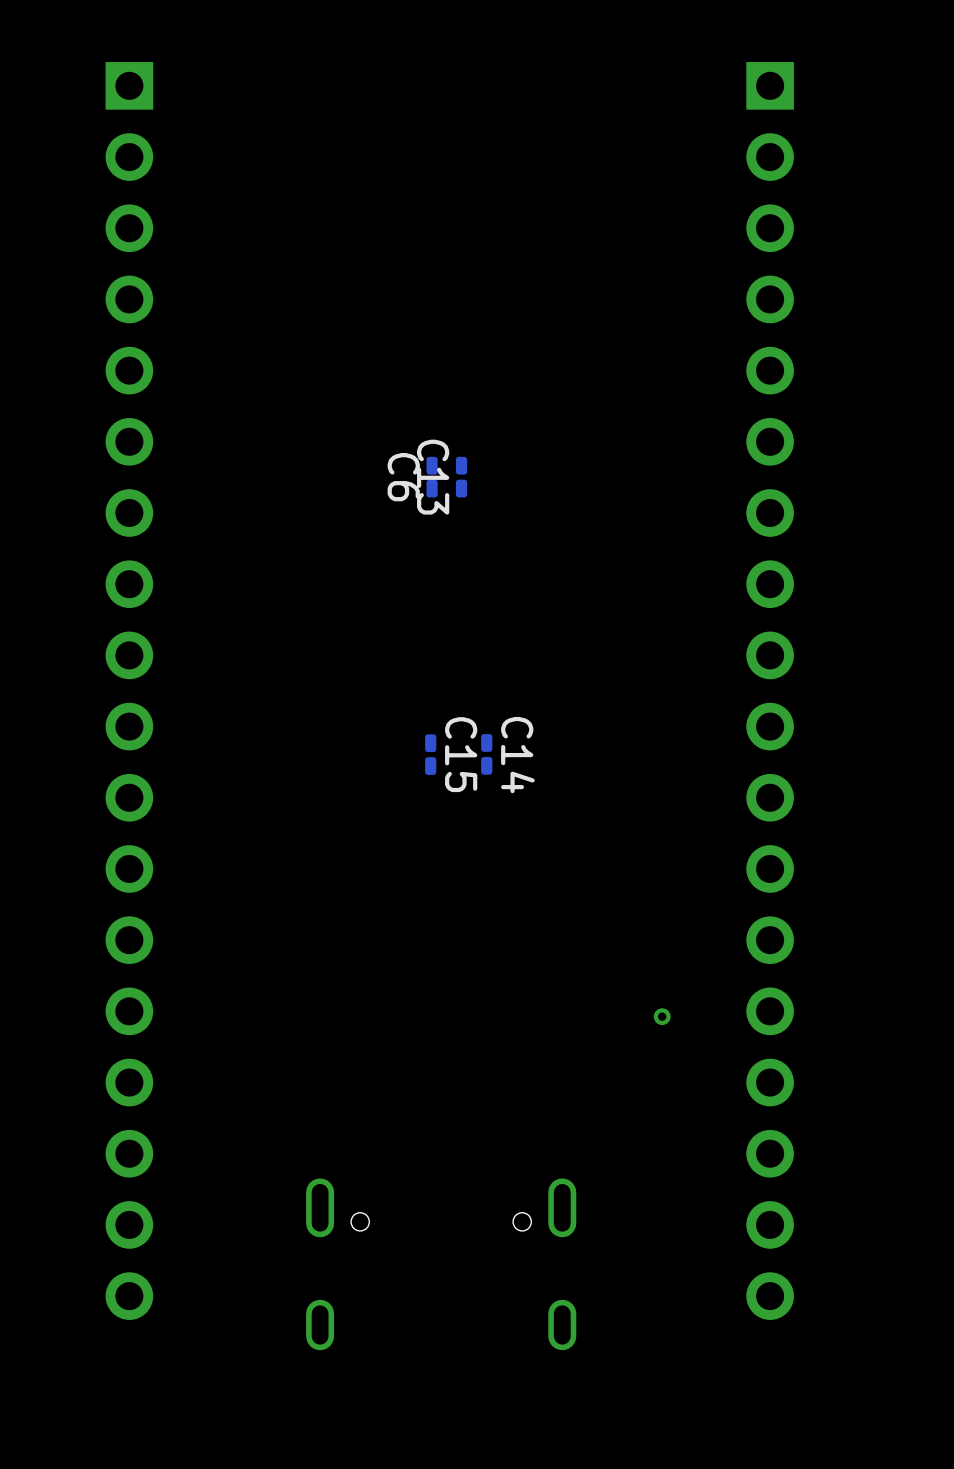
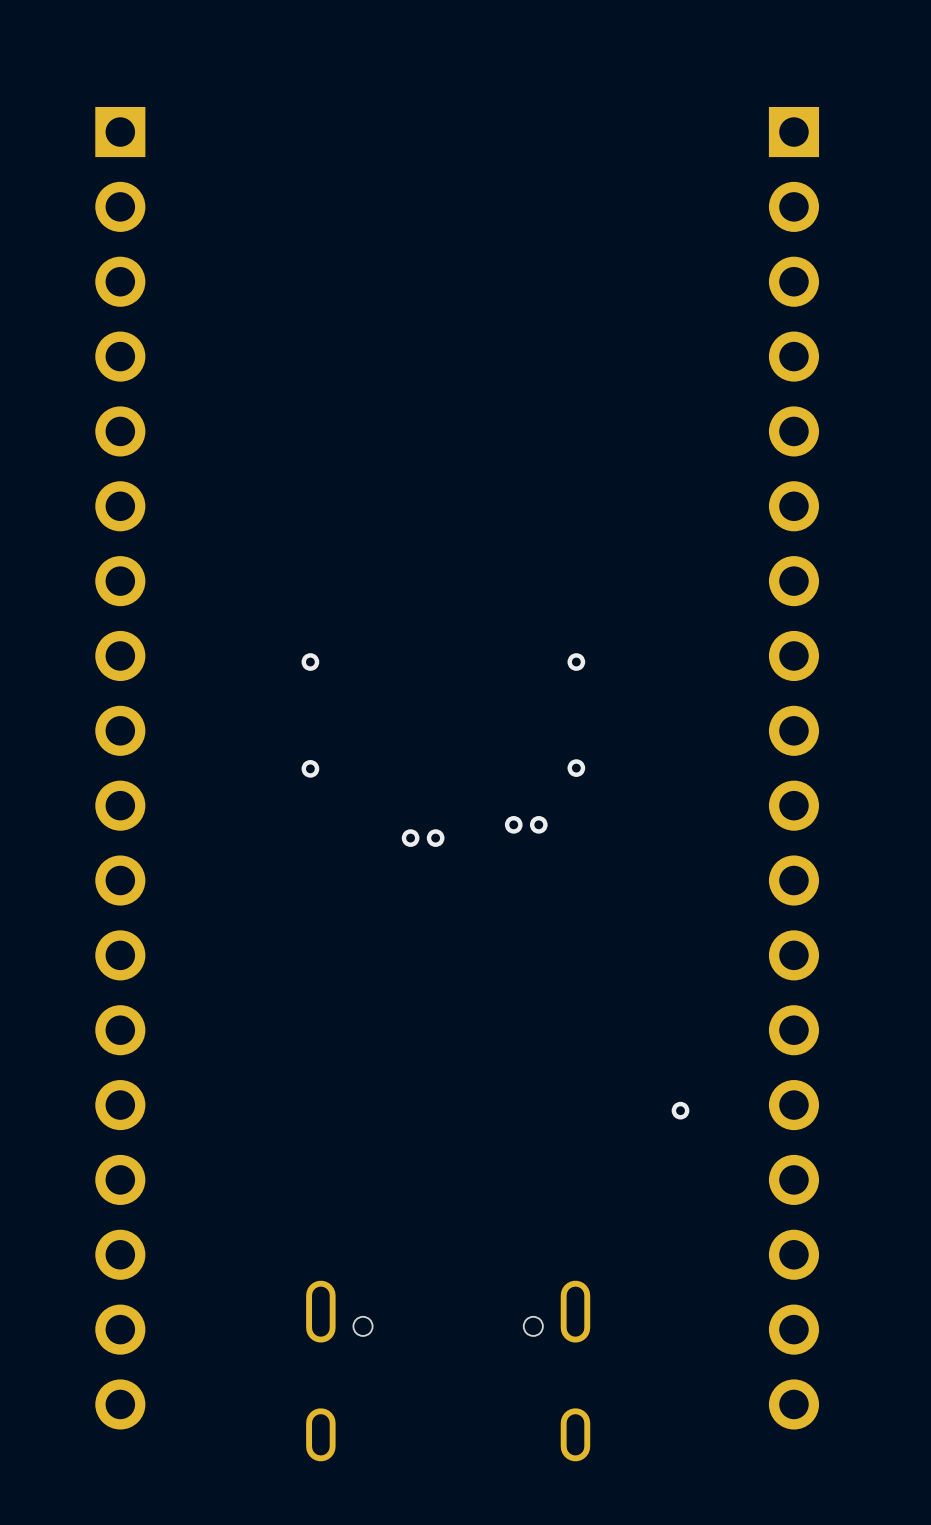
C6: (432, 477) -> none
C13: (461, 477) -> none
via: none -> (310, 662)
via: none -> (576, 662)
via: none -> (576, 768)
via: none -> (310, 768)
via: none -> (513, 824)
via: none -> (538, 824)
C15: (430, 754) -> none
C14: (486, 754) -> none
via: none -> (410, 838)
via: none -> (435, 838)

